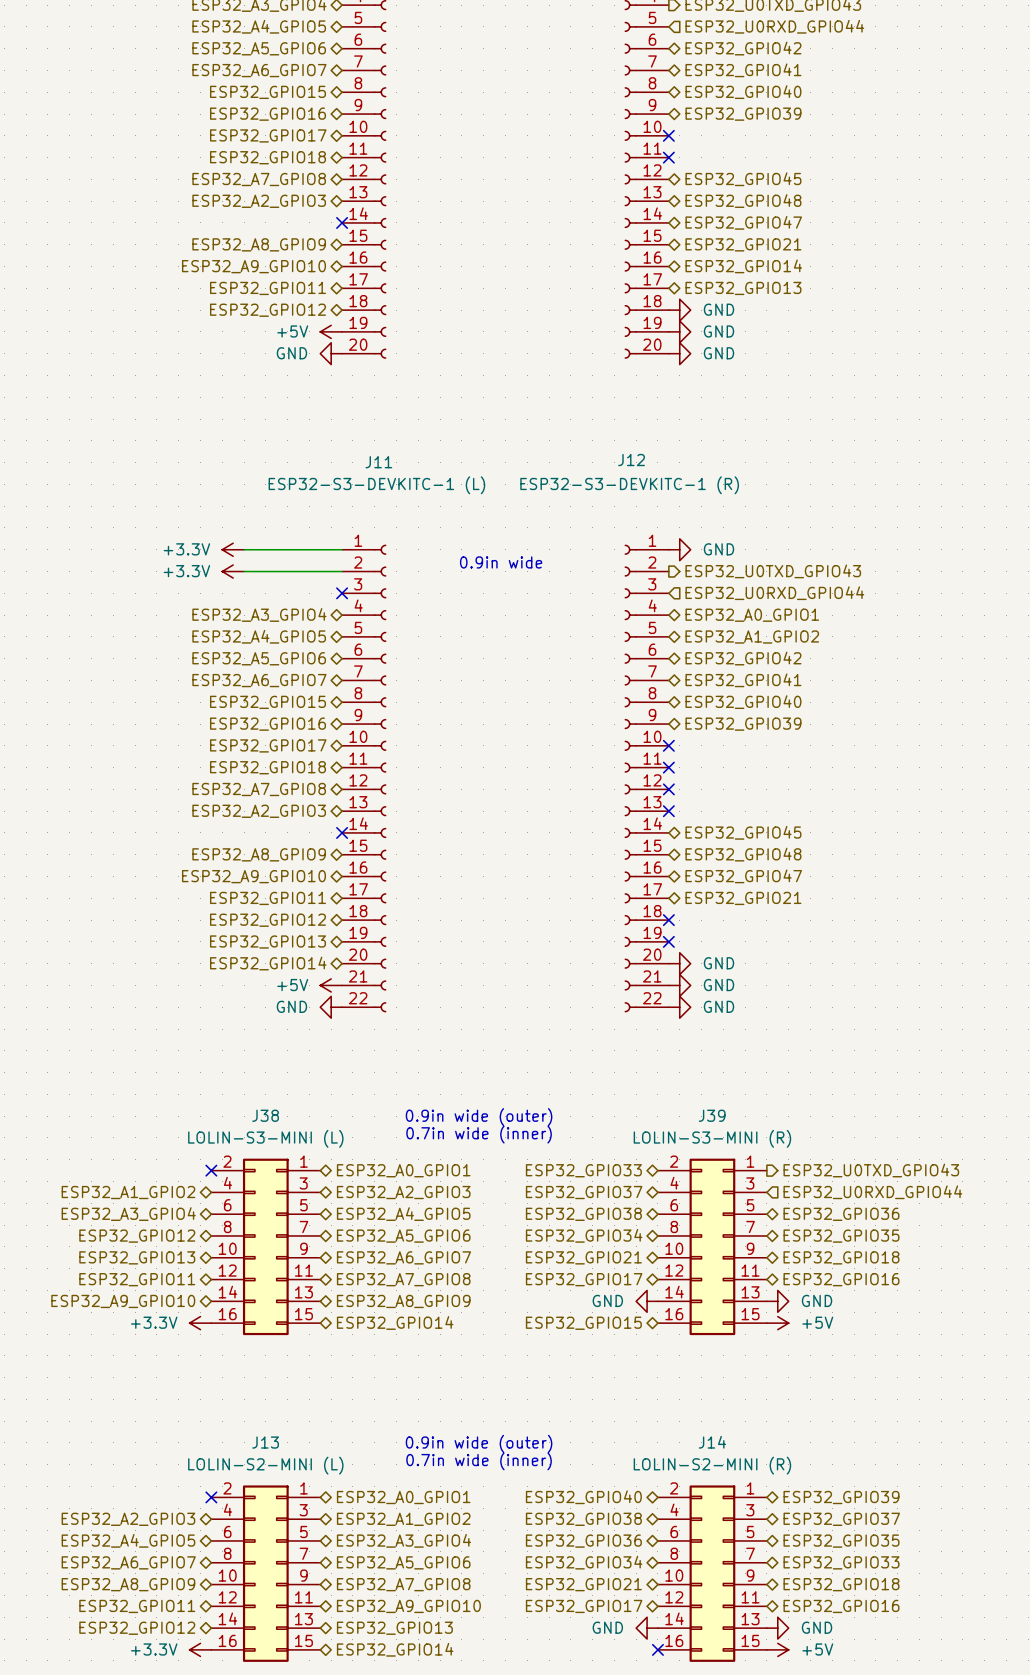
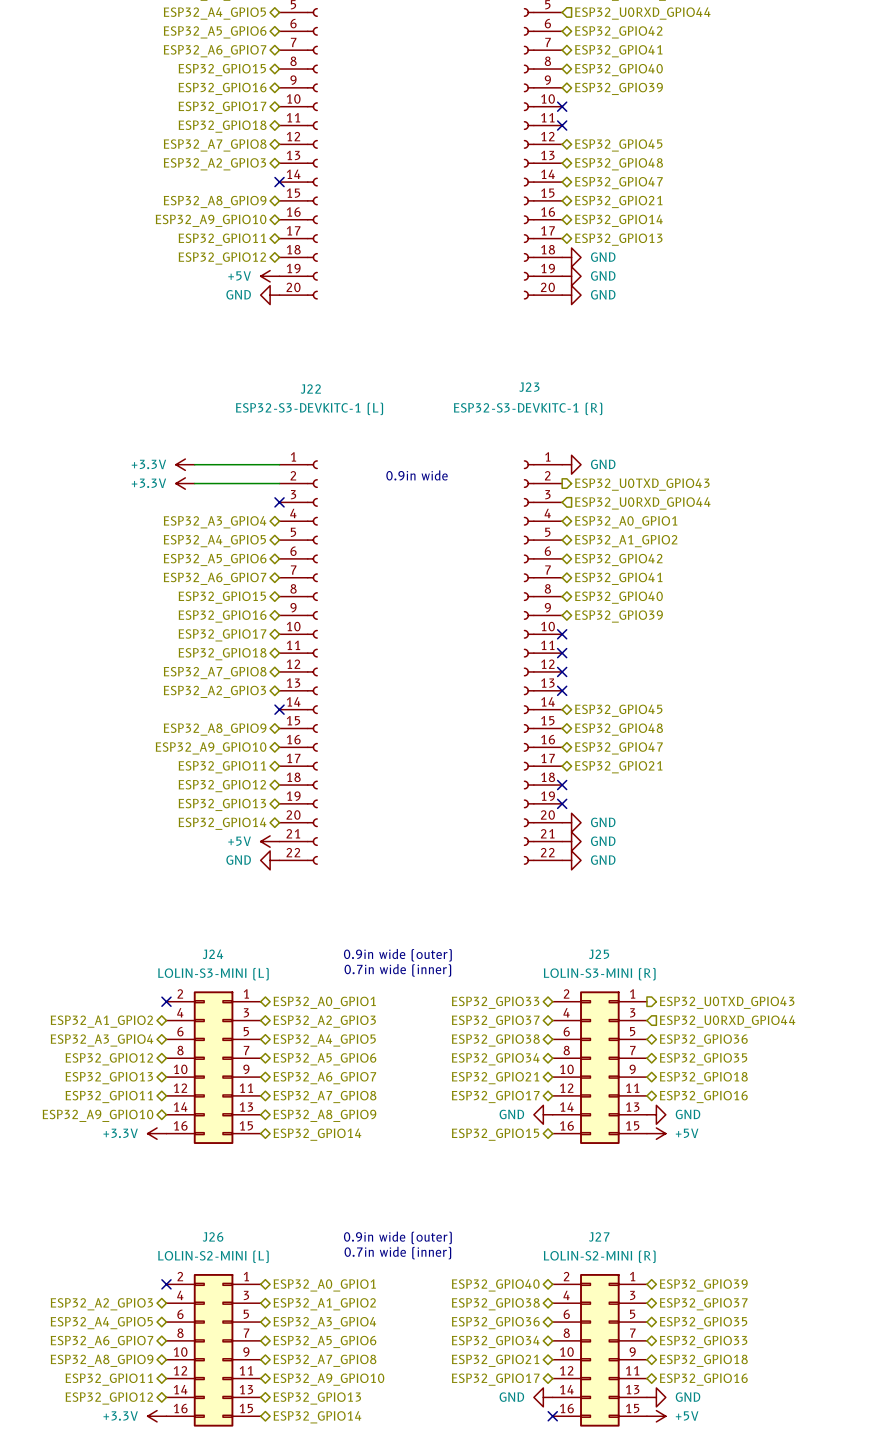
J12 name: J12 (631, 460) -> J23 (529, 387)
J11 name: J11 (378, 462) -> J22 (310, 389)
J38 name: J38 (265, 1115) -> J24 (212, 954)
J39 name: J39 (712, 1115) -> J25 (599, 954)
J13 name: J13 (265, 1442) -> J26 (213, 1236)
J14 name: J14 (712, 1442) -> J27 (599, 1236)

